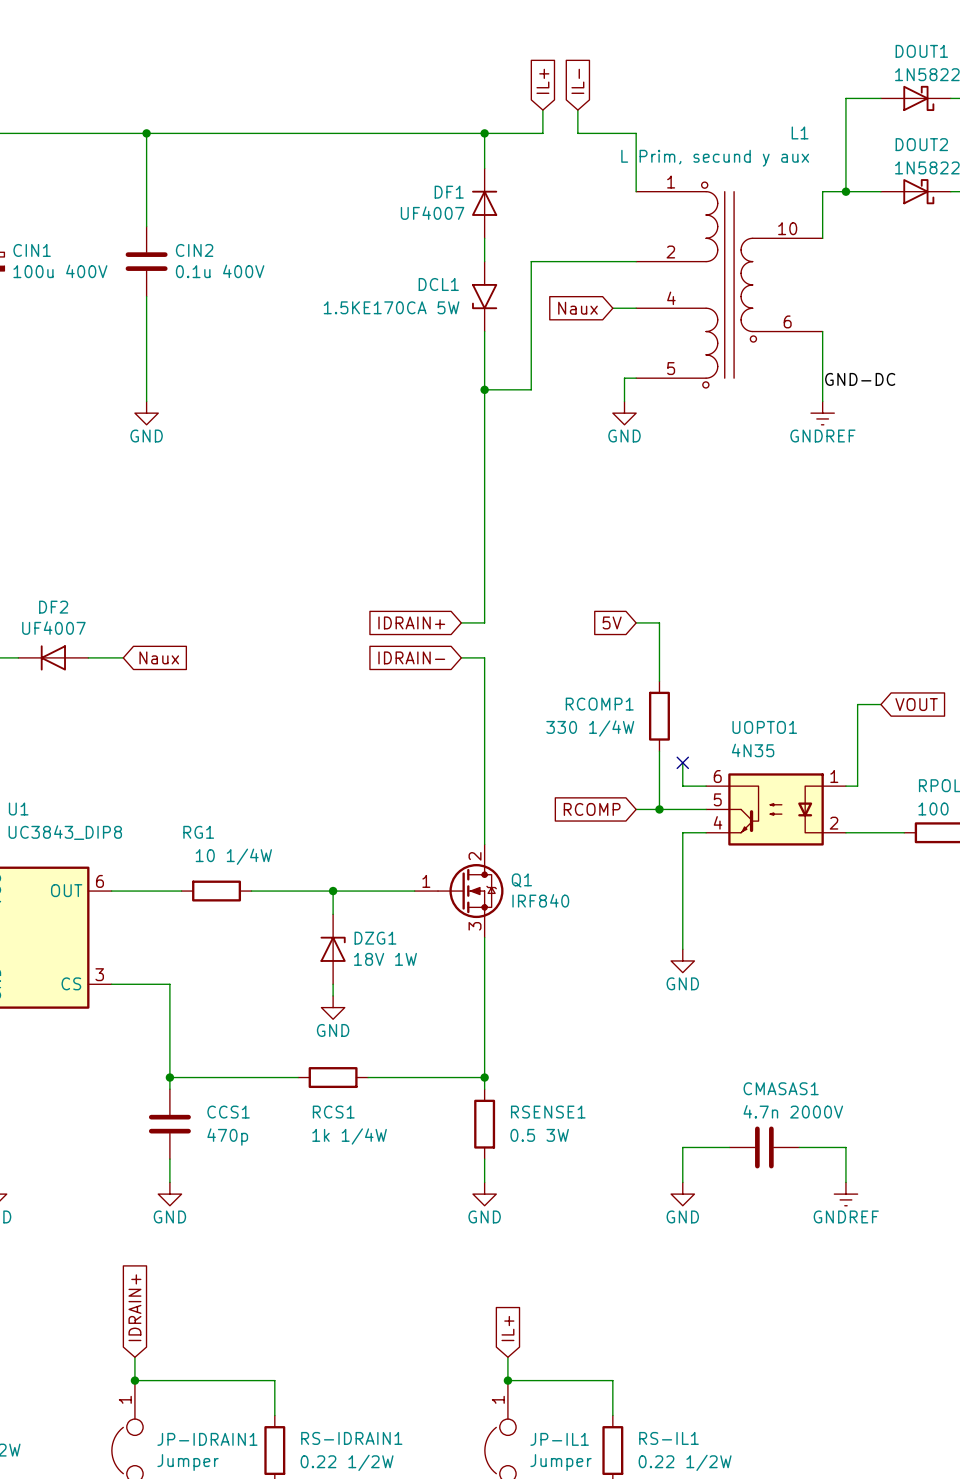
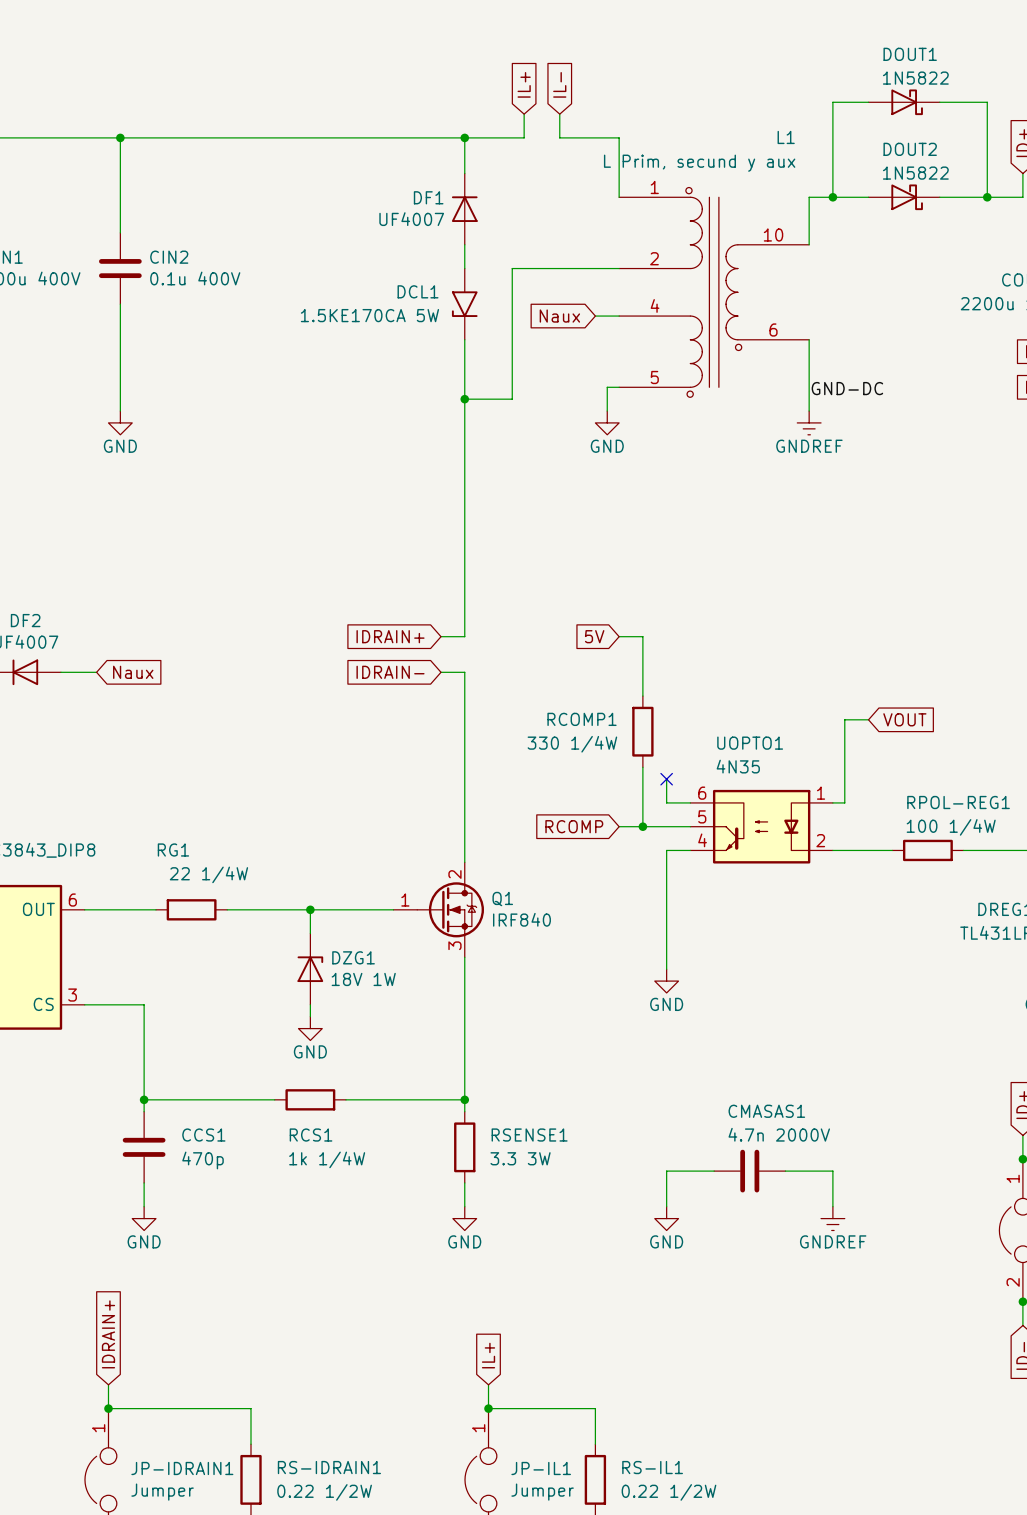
RG1 value: 10 1/4W (233, 856) -> 22 1/4W (208, 874)
RSENSE1 value: 0.5 3W (539, 1135) -> 3.3 3W (520, 1158)

